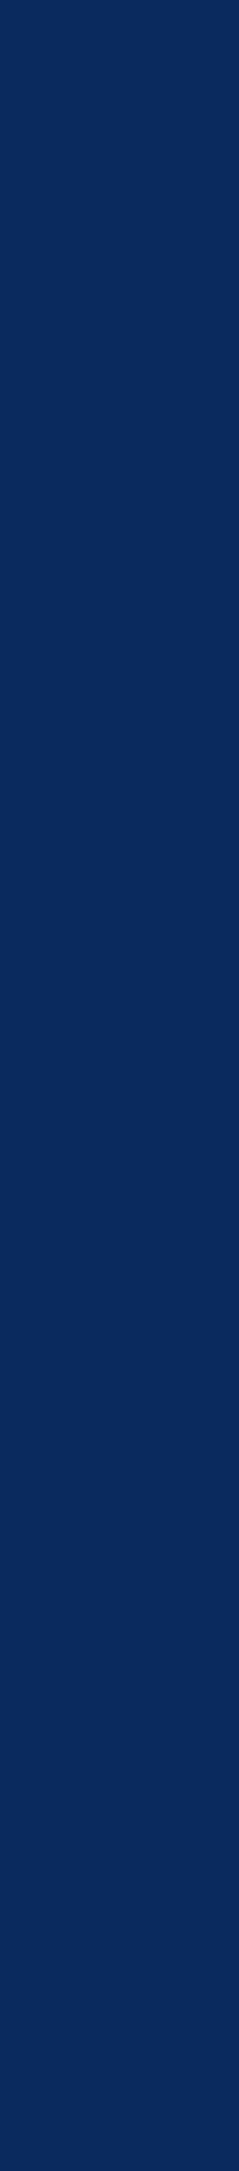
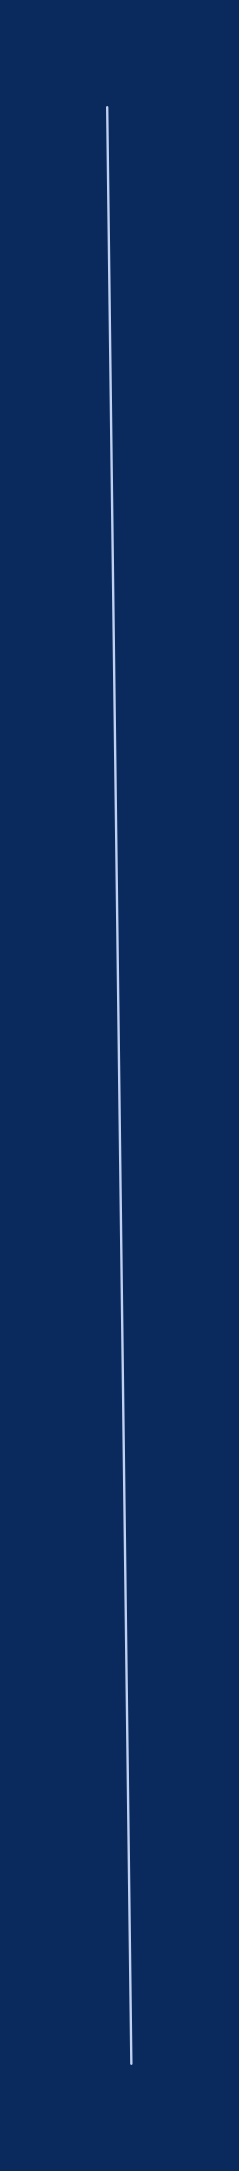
board edge: none -> (107, 107) (131, 2063)

